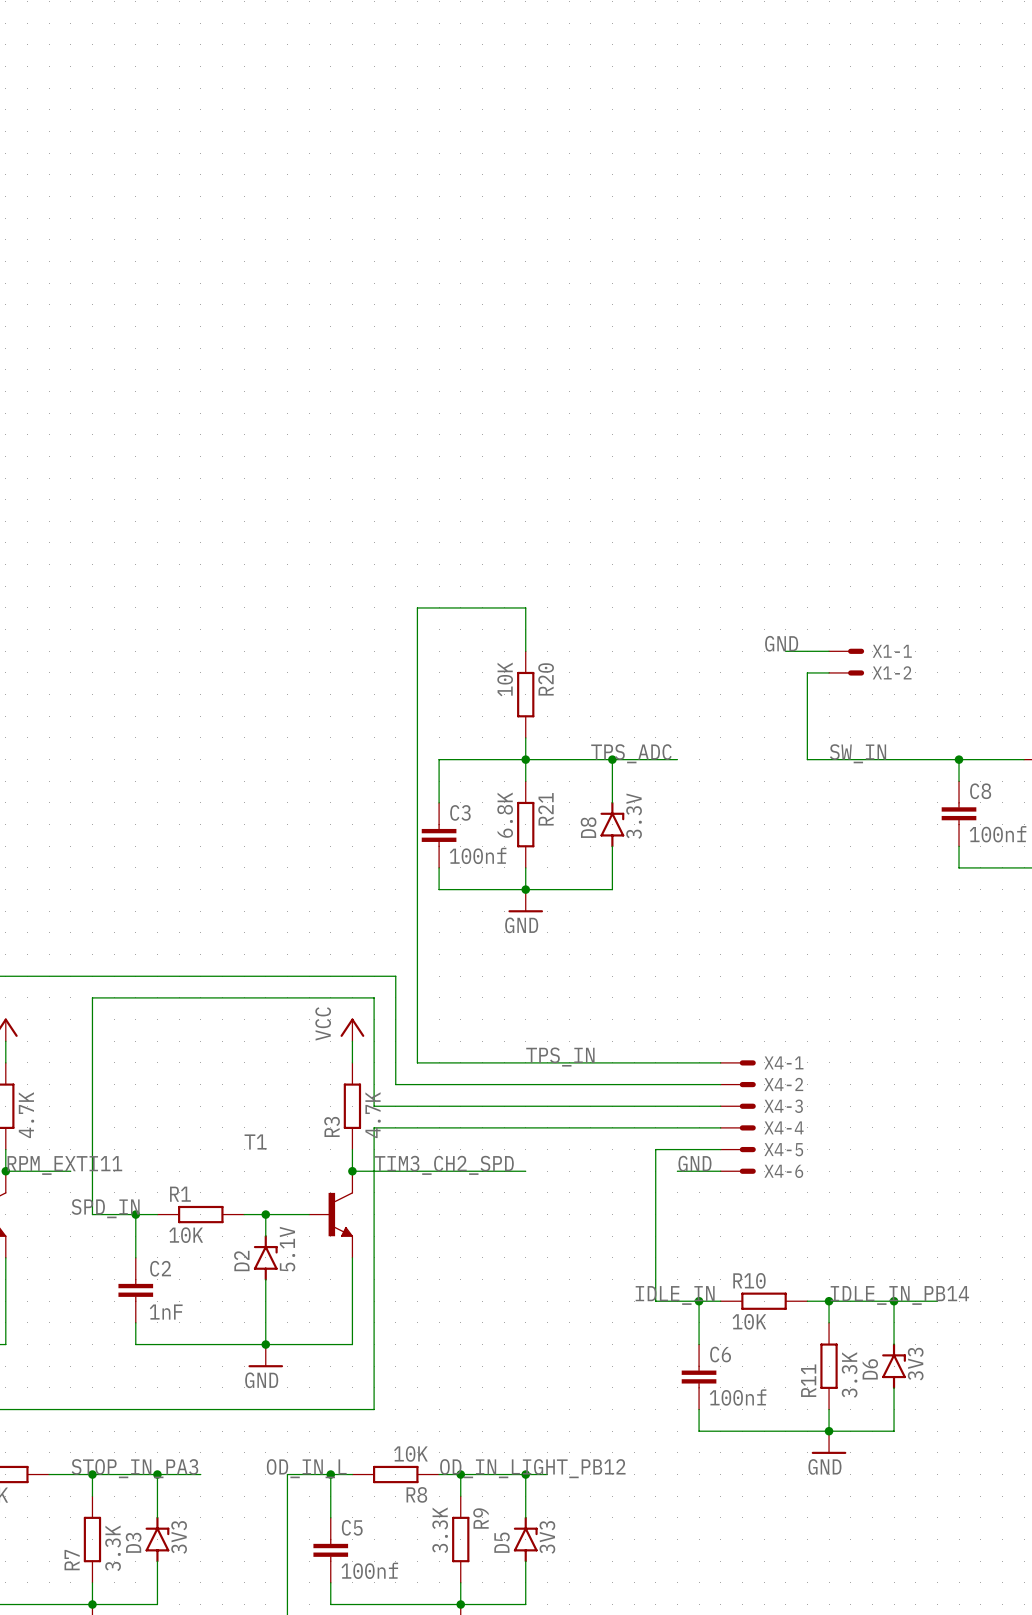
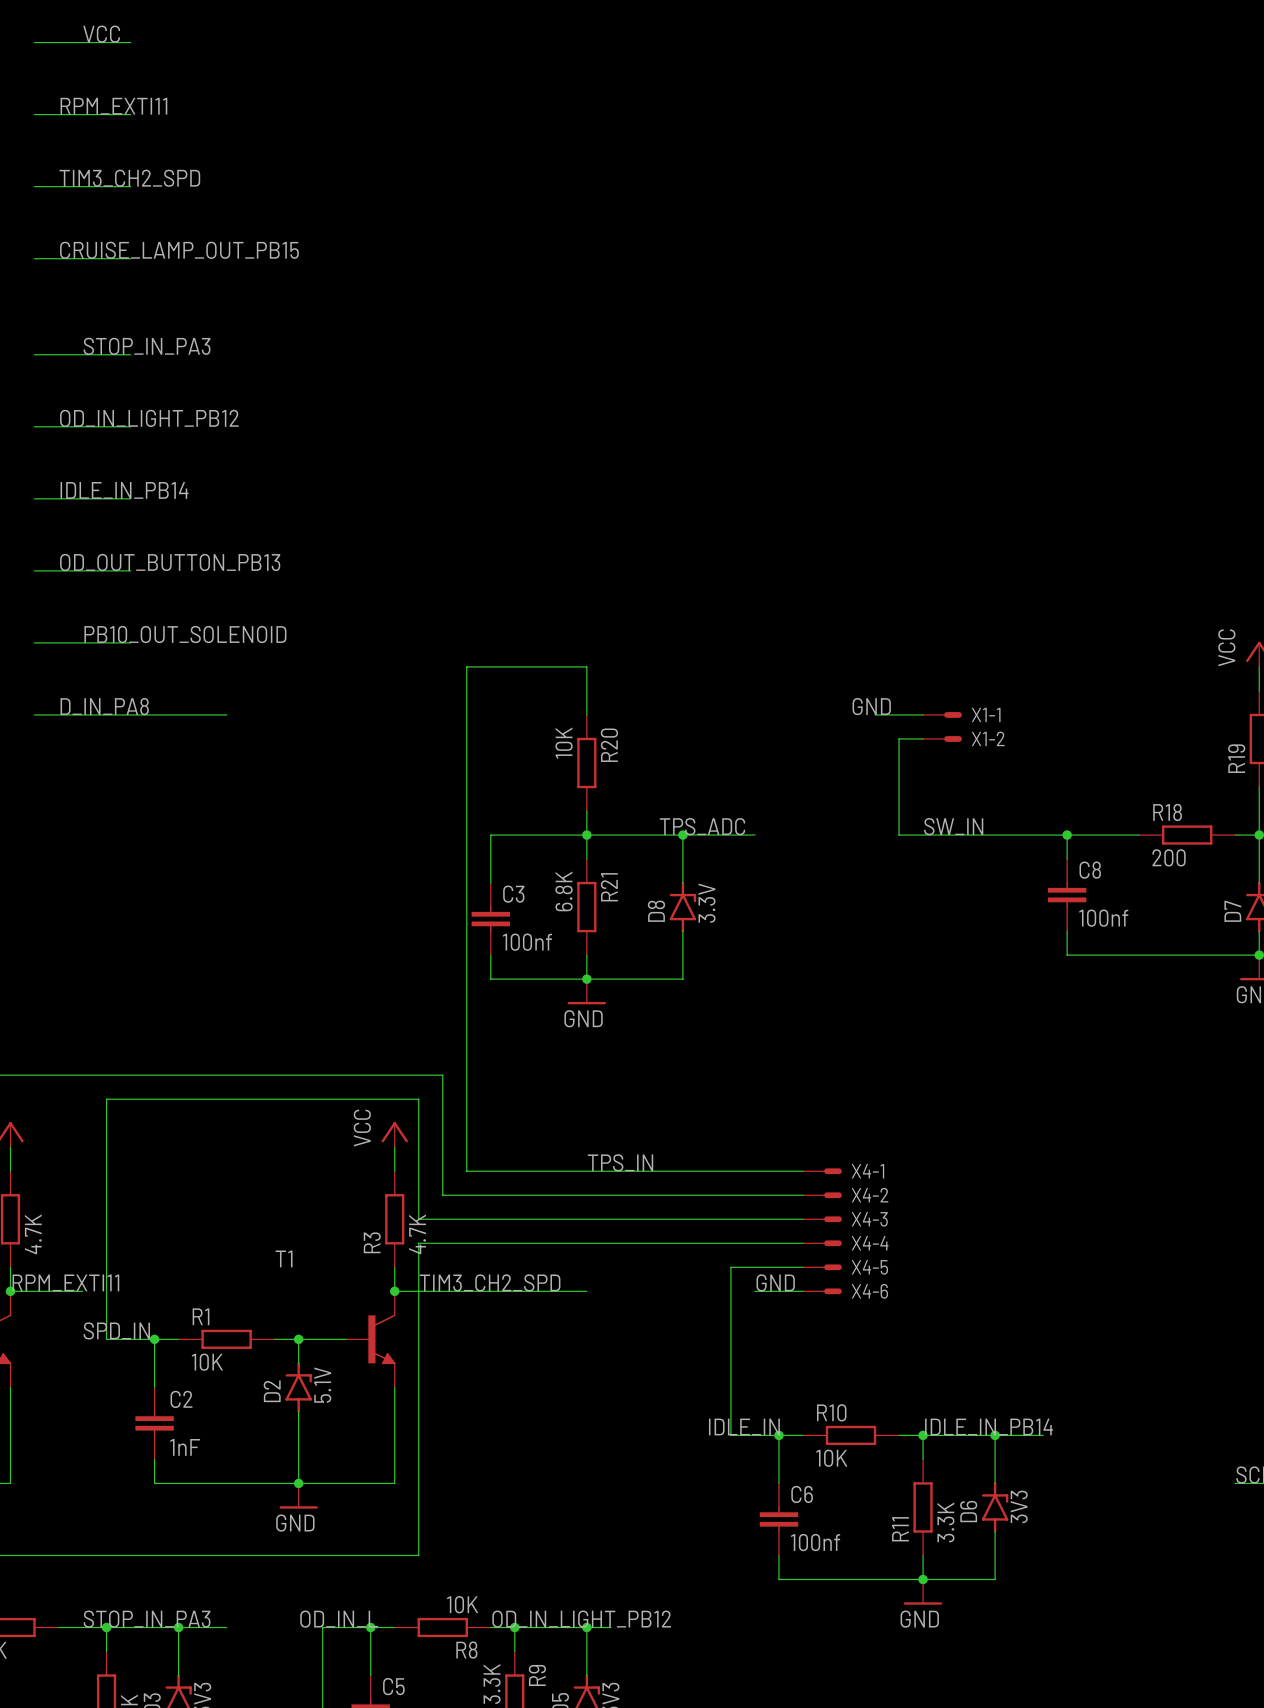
label: none -> VCC (101, 34)
wire: none -> (34, 42) (130, 42)
label: none -> RPM_EXTI11 (113, 106)
wire: none -> (34, 114) (130, 114)
label: none -> TIM3_CH2_SPD (129, 178)
wire: none -> (34, 186) (130, 186)
label: none -> CRUISE_LAMP_OUT_PB15 (179, 250)
wire: none -> (34, 258) (130, 258)
label: none -> STOP_IN_PA3 (147, 346)
wire: none -> (34, 354) (130, 354)
label: none -> OD_IN_LIGHT_PB12 (149, 418)
wire: none -> (34, 426) (130, 426)
label: none -> IDLE_IN_PB14 (124, 490)
wire: none -> (34, 498) (130, 498)
label: none -> OD_OUT_BUTTON_PB13 (170, 562)
wire: none -> (34, 570) (130, 570)
label: none -> PB10_OUT_SOLENOID (185, 634)
wire: none -> (34, 642) (130, 642)
label: none -> D_IN_PA8 (104, 706)
wire: none -> (34, 714) (226, 714)

